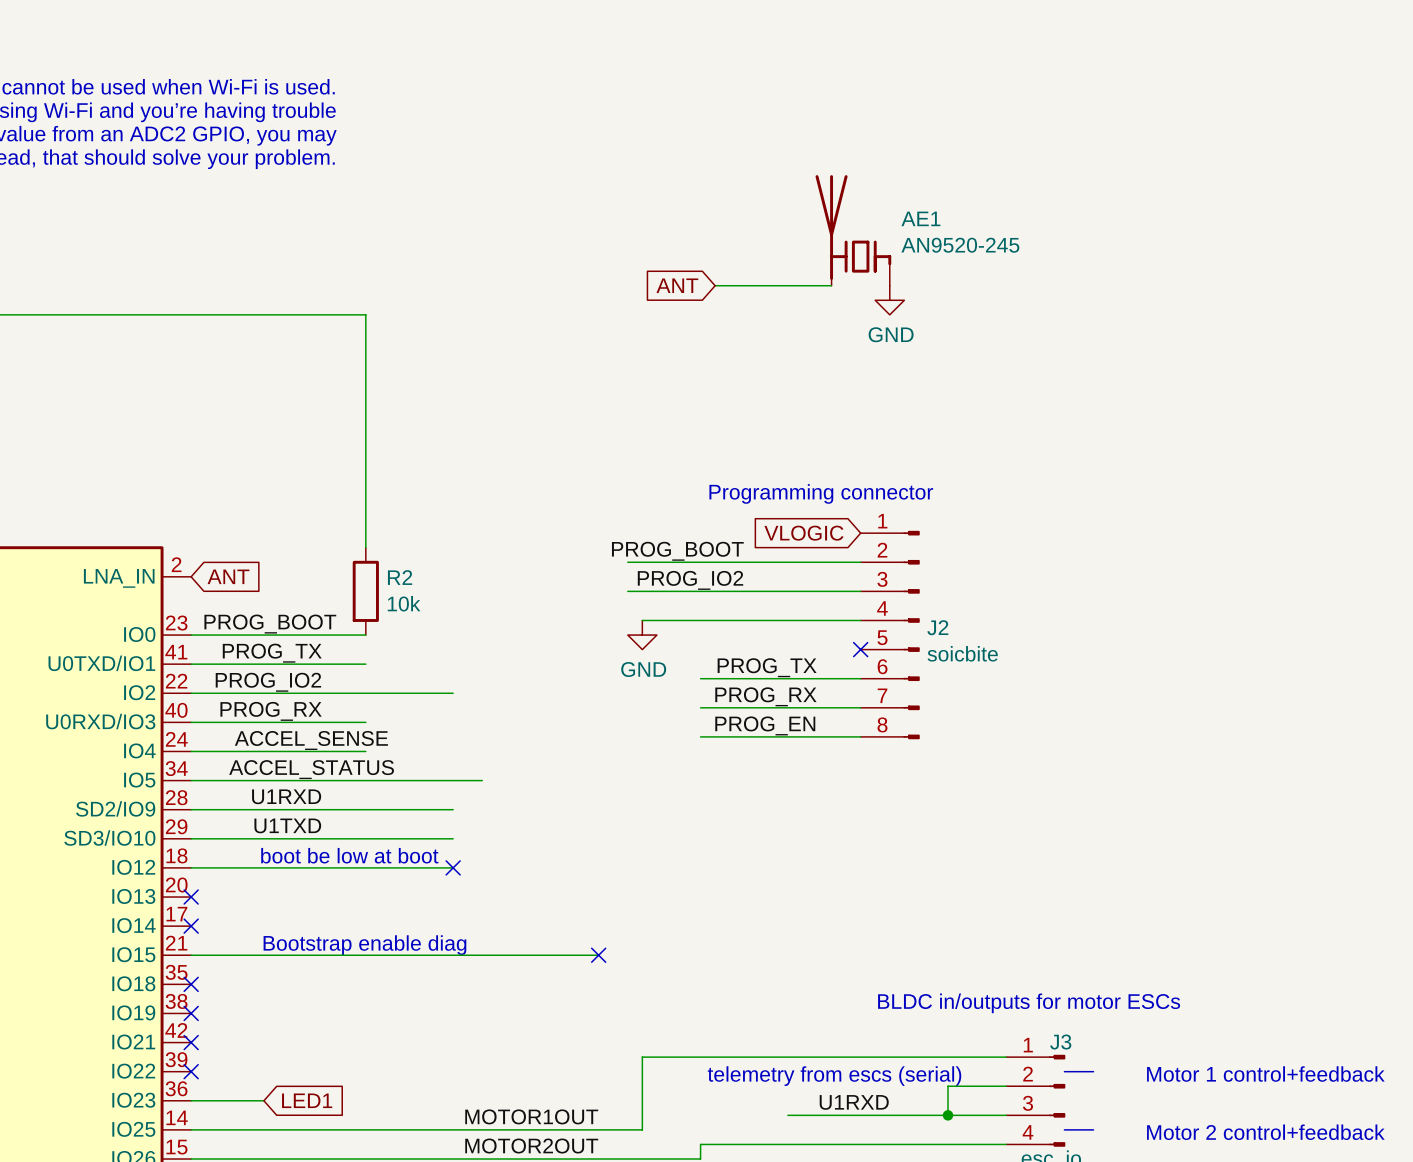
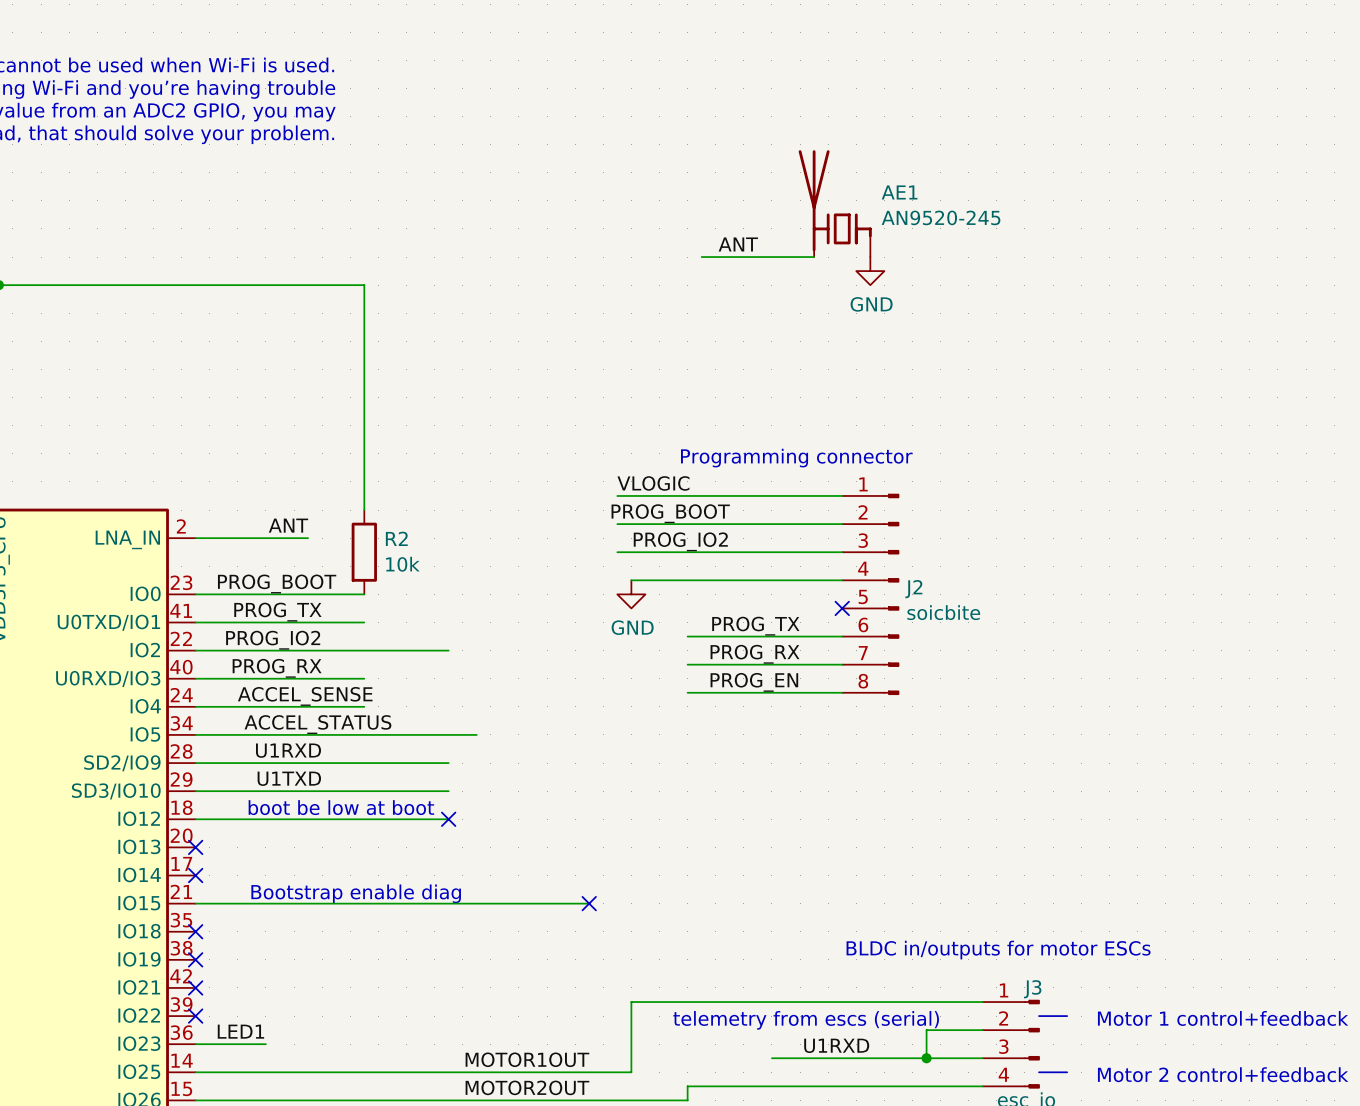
label: none -> ANT (738, 244)
global label: ANT (677, 285) -> none
label: none -> VLOGIC (653, 483)
wire: none -> (617, 495) (842, 495)
global label: VLOGIC (803, 533) -> none
label: none -> ANT (288, 525)
wire: none -> (195, 538) (308, 538)
global label: ANT (228, 576) -> none
label: none -> LED1 (240, 1031)
global label: LED1 (307, 1100) -> none

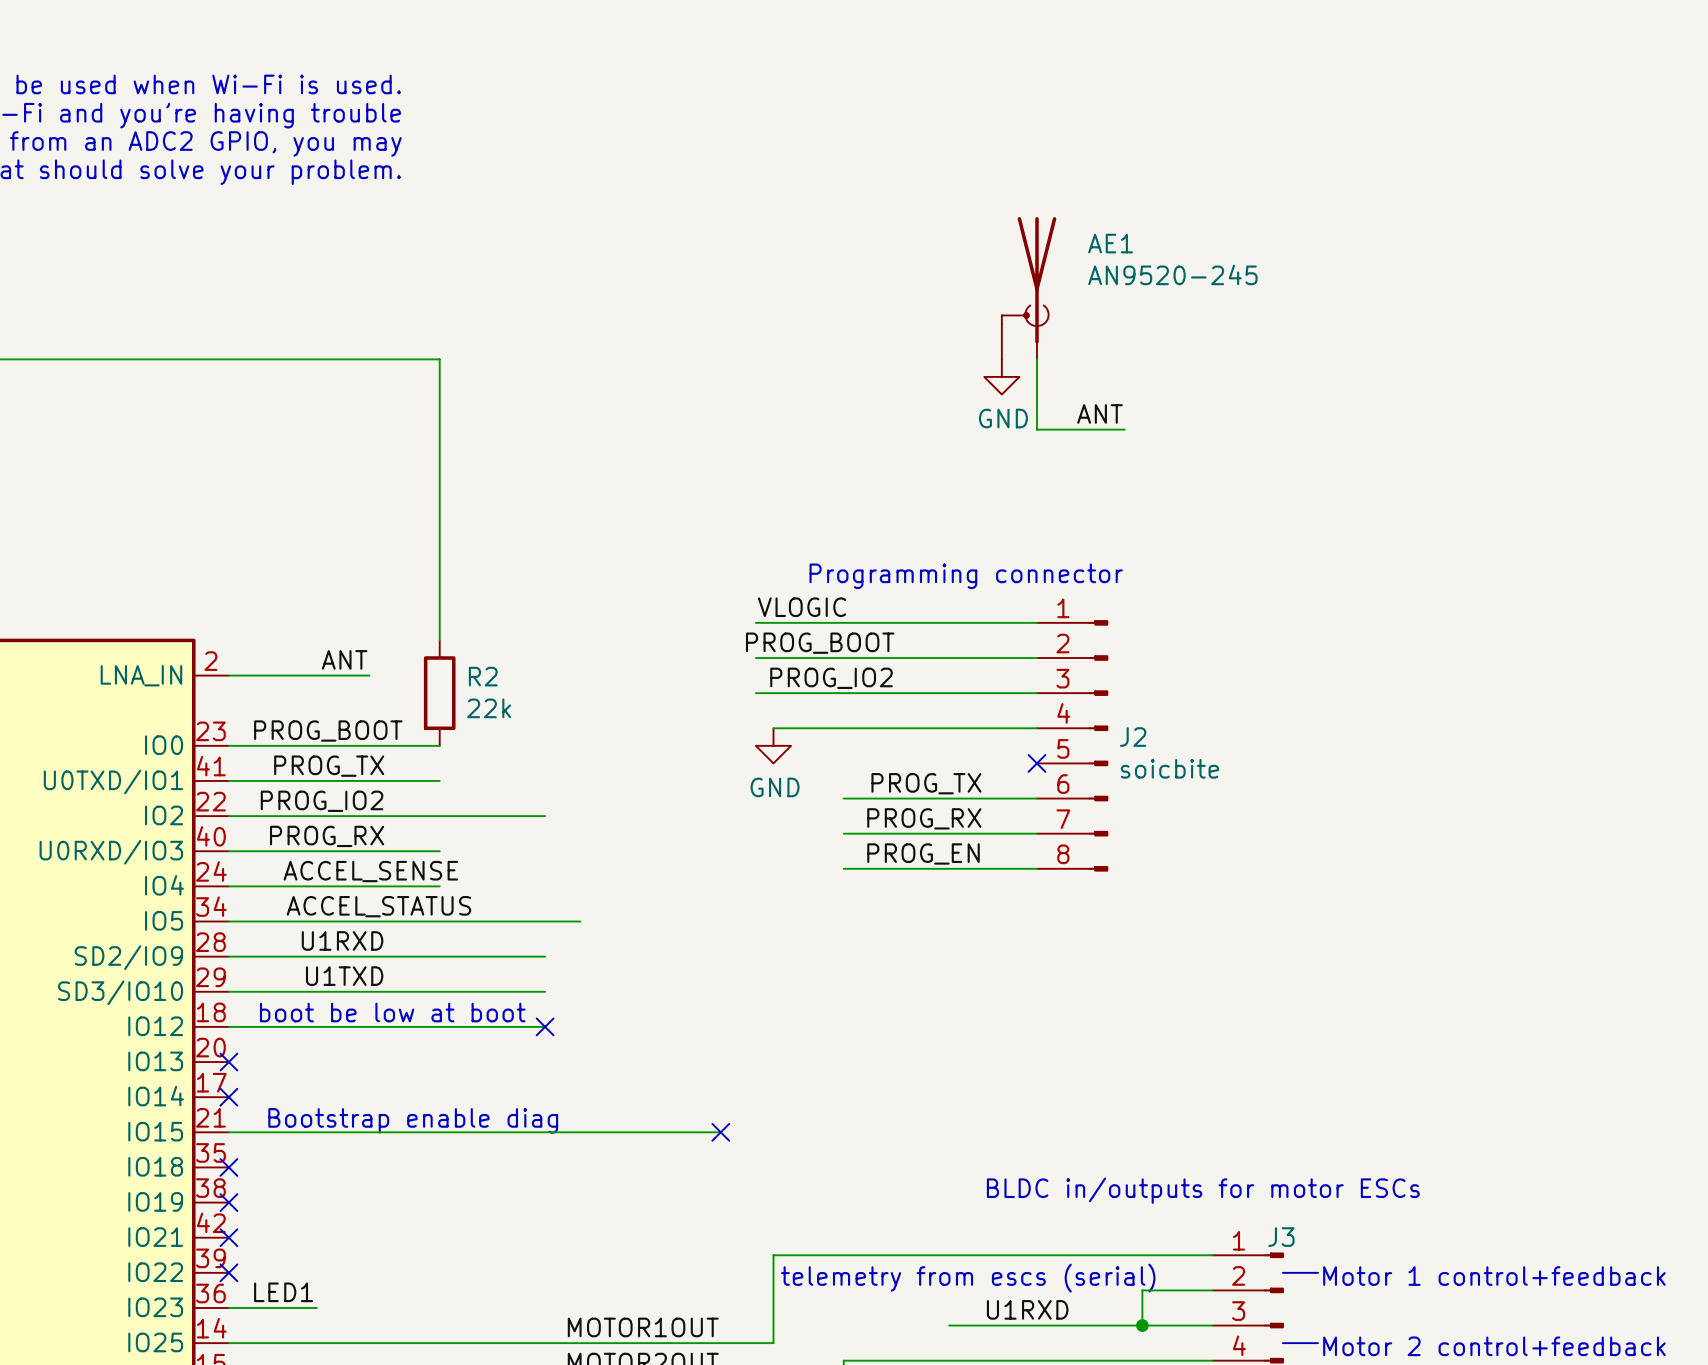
AE1 symbol: [798, 150, 872, 258] -> [1001, 217, 1057, 360]
label position: ANT (738, 244) -> ANT (1100, 413)
wire: (701, 257) (814, 257) -> none
power symbol position: GND (870, 271) -> GND (1001, 376)
wire: none -> (1036, 359) (1036, 429) (1124, 429)
R2 value: 10k (402, 564) -> 22k (489, 708)

